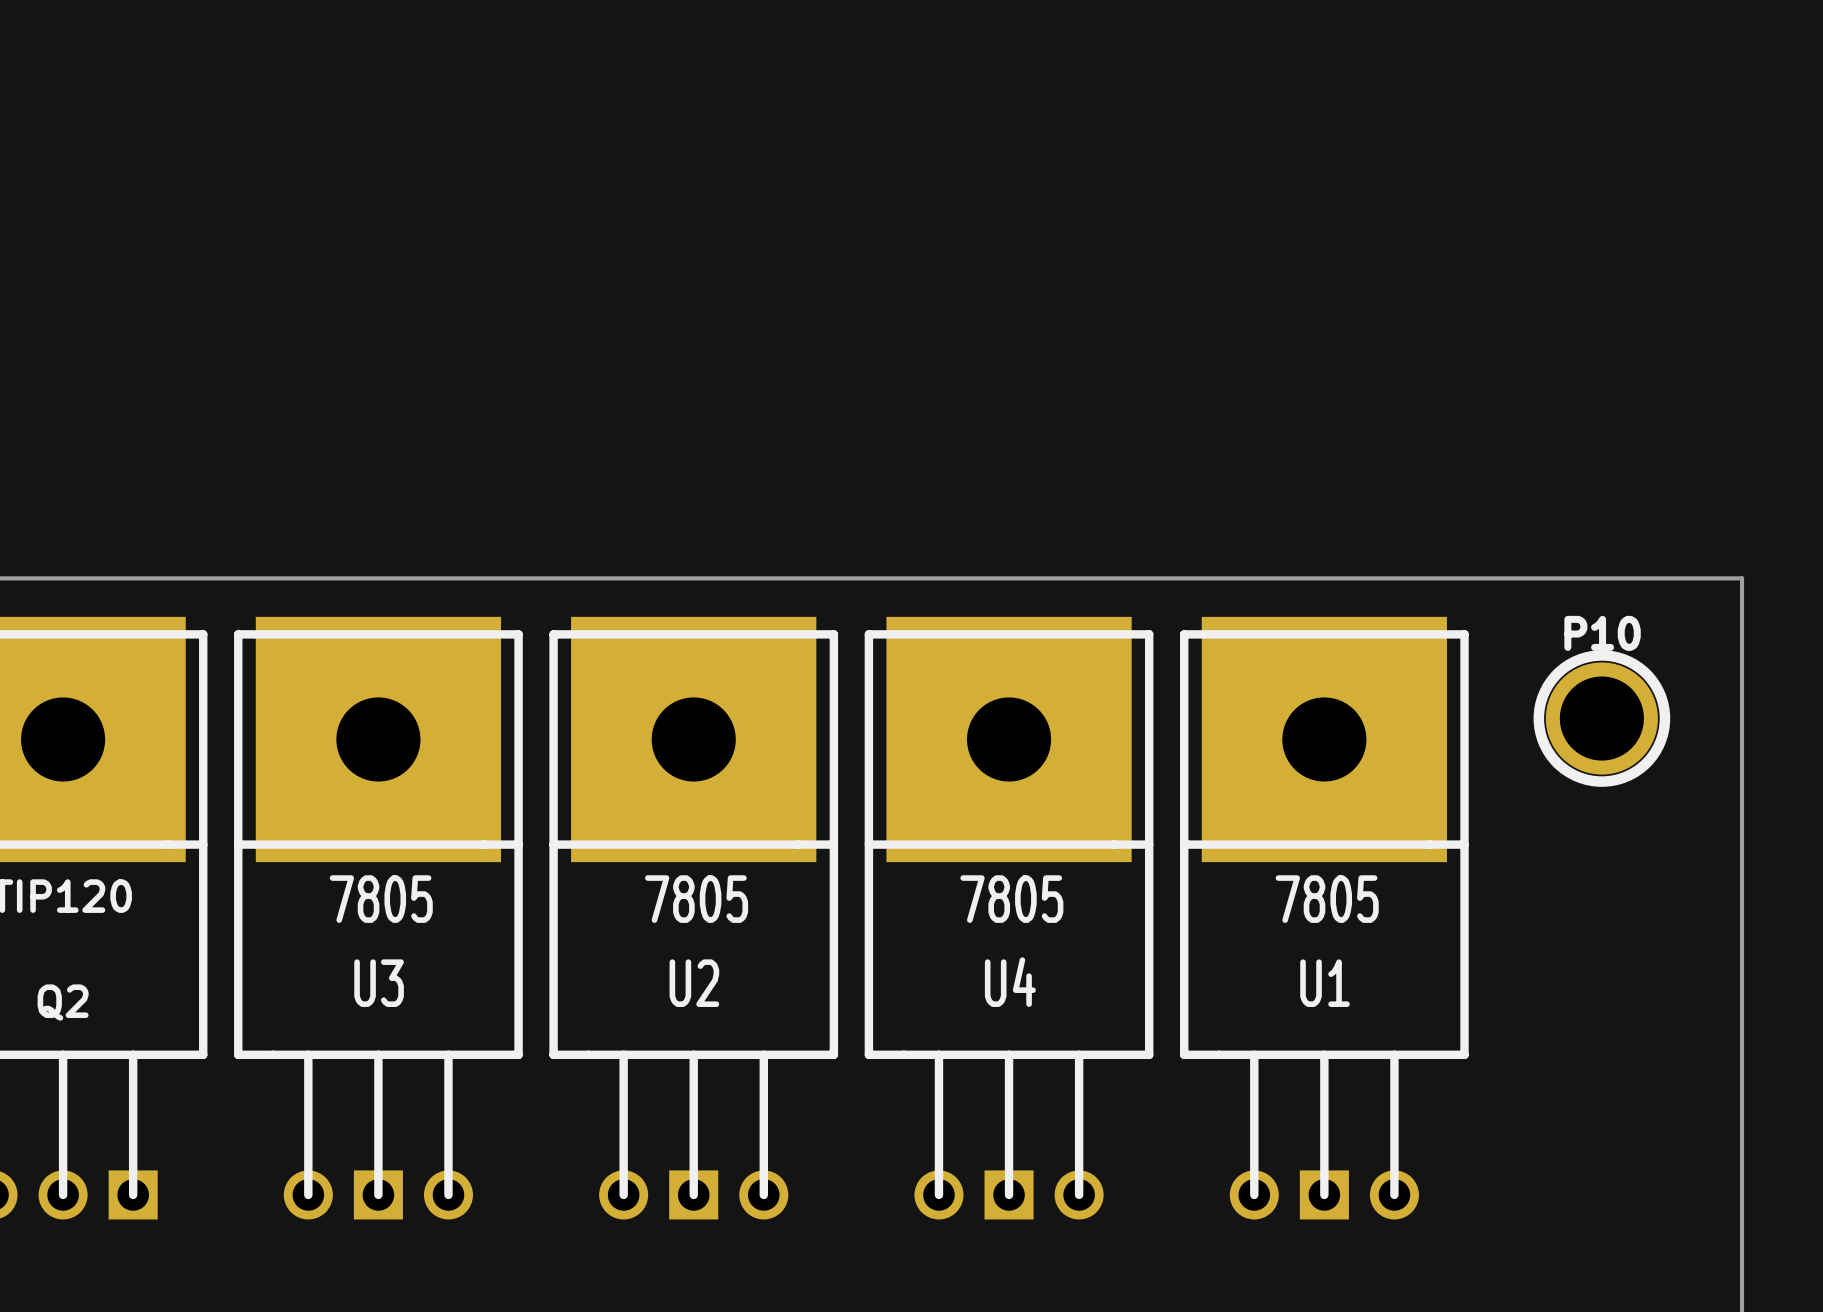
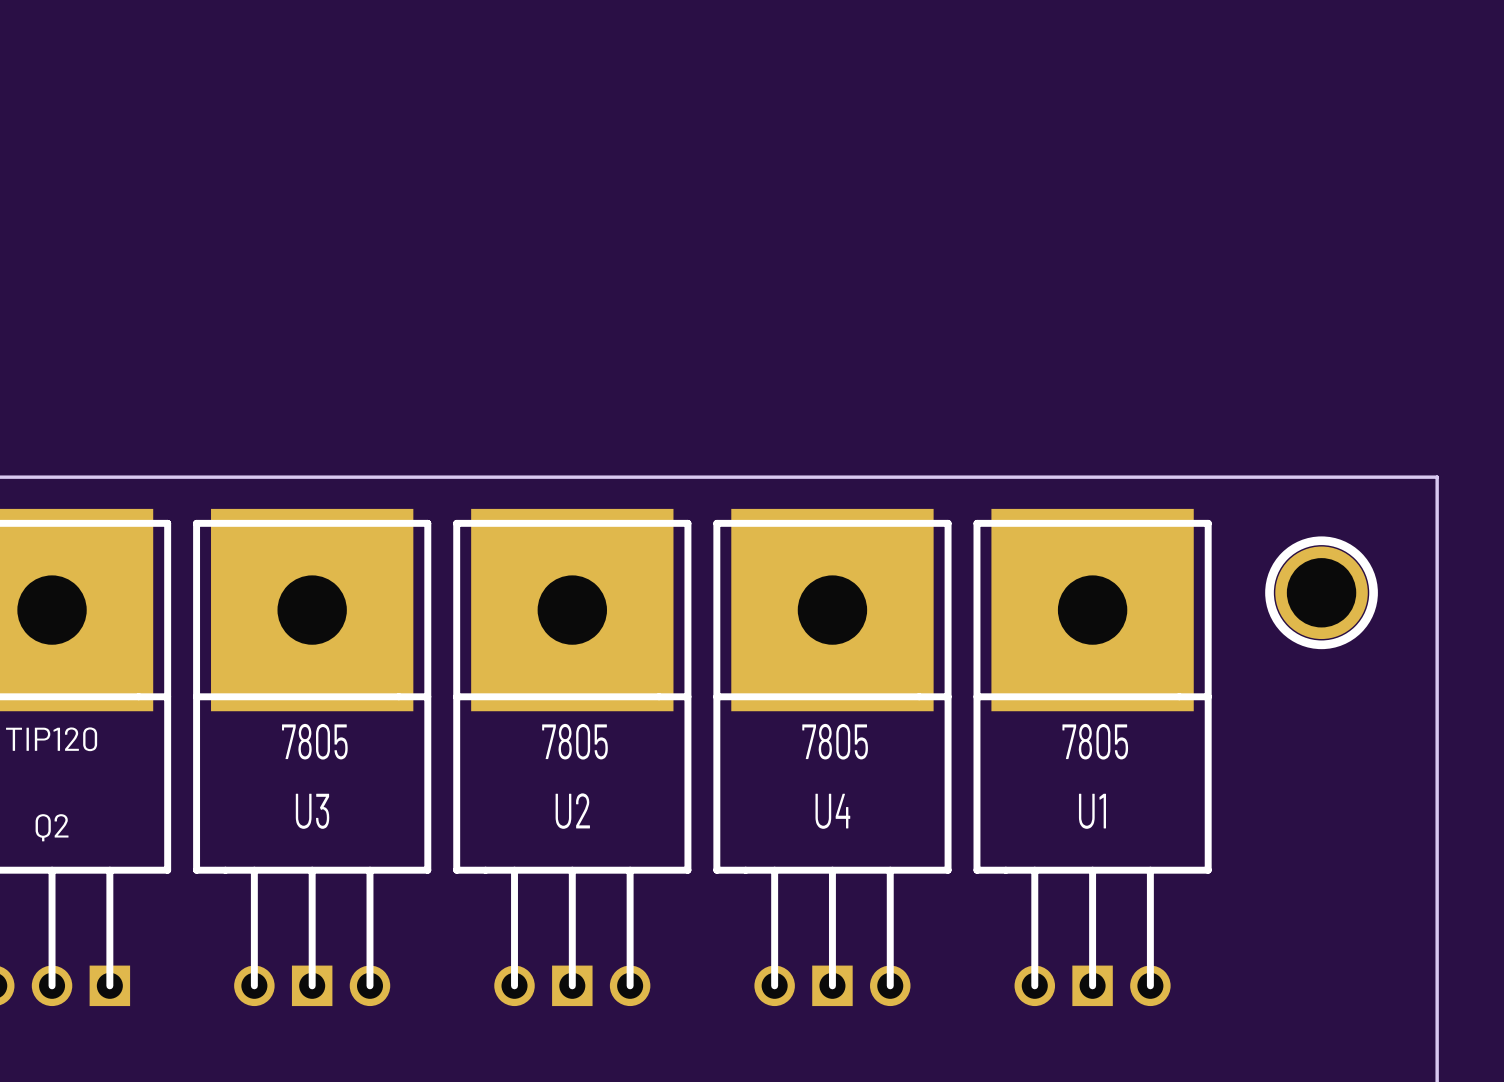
P10 name: P10 (1602, 633) -> none

